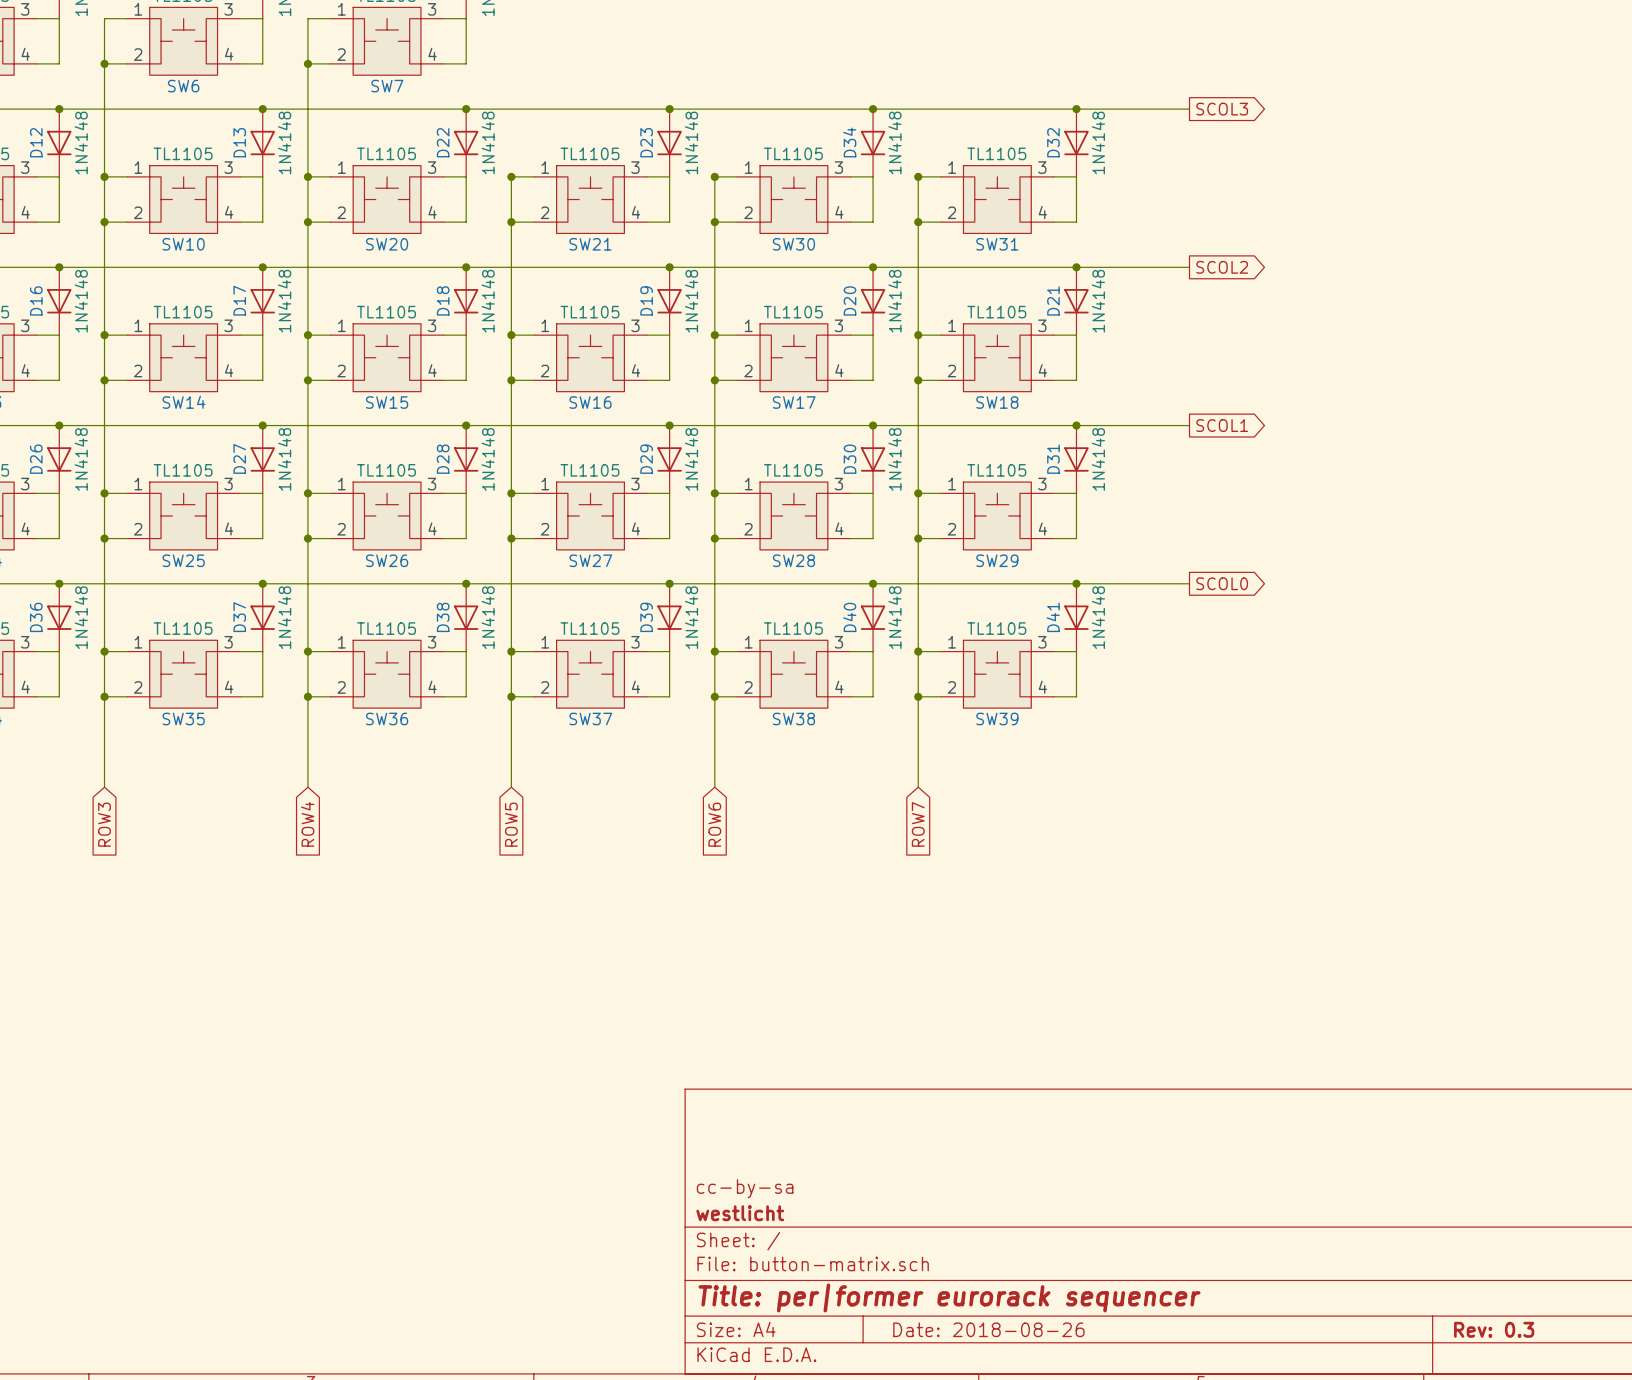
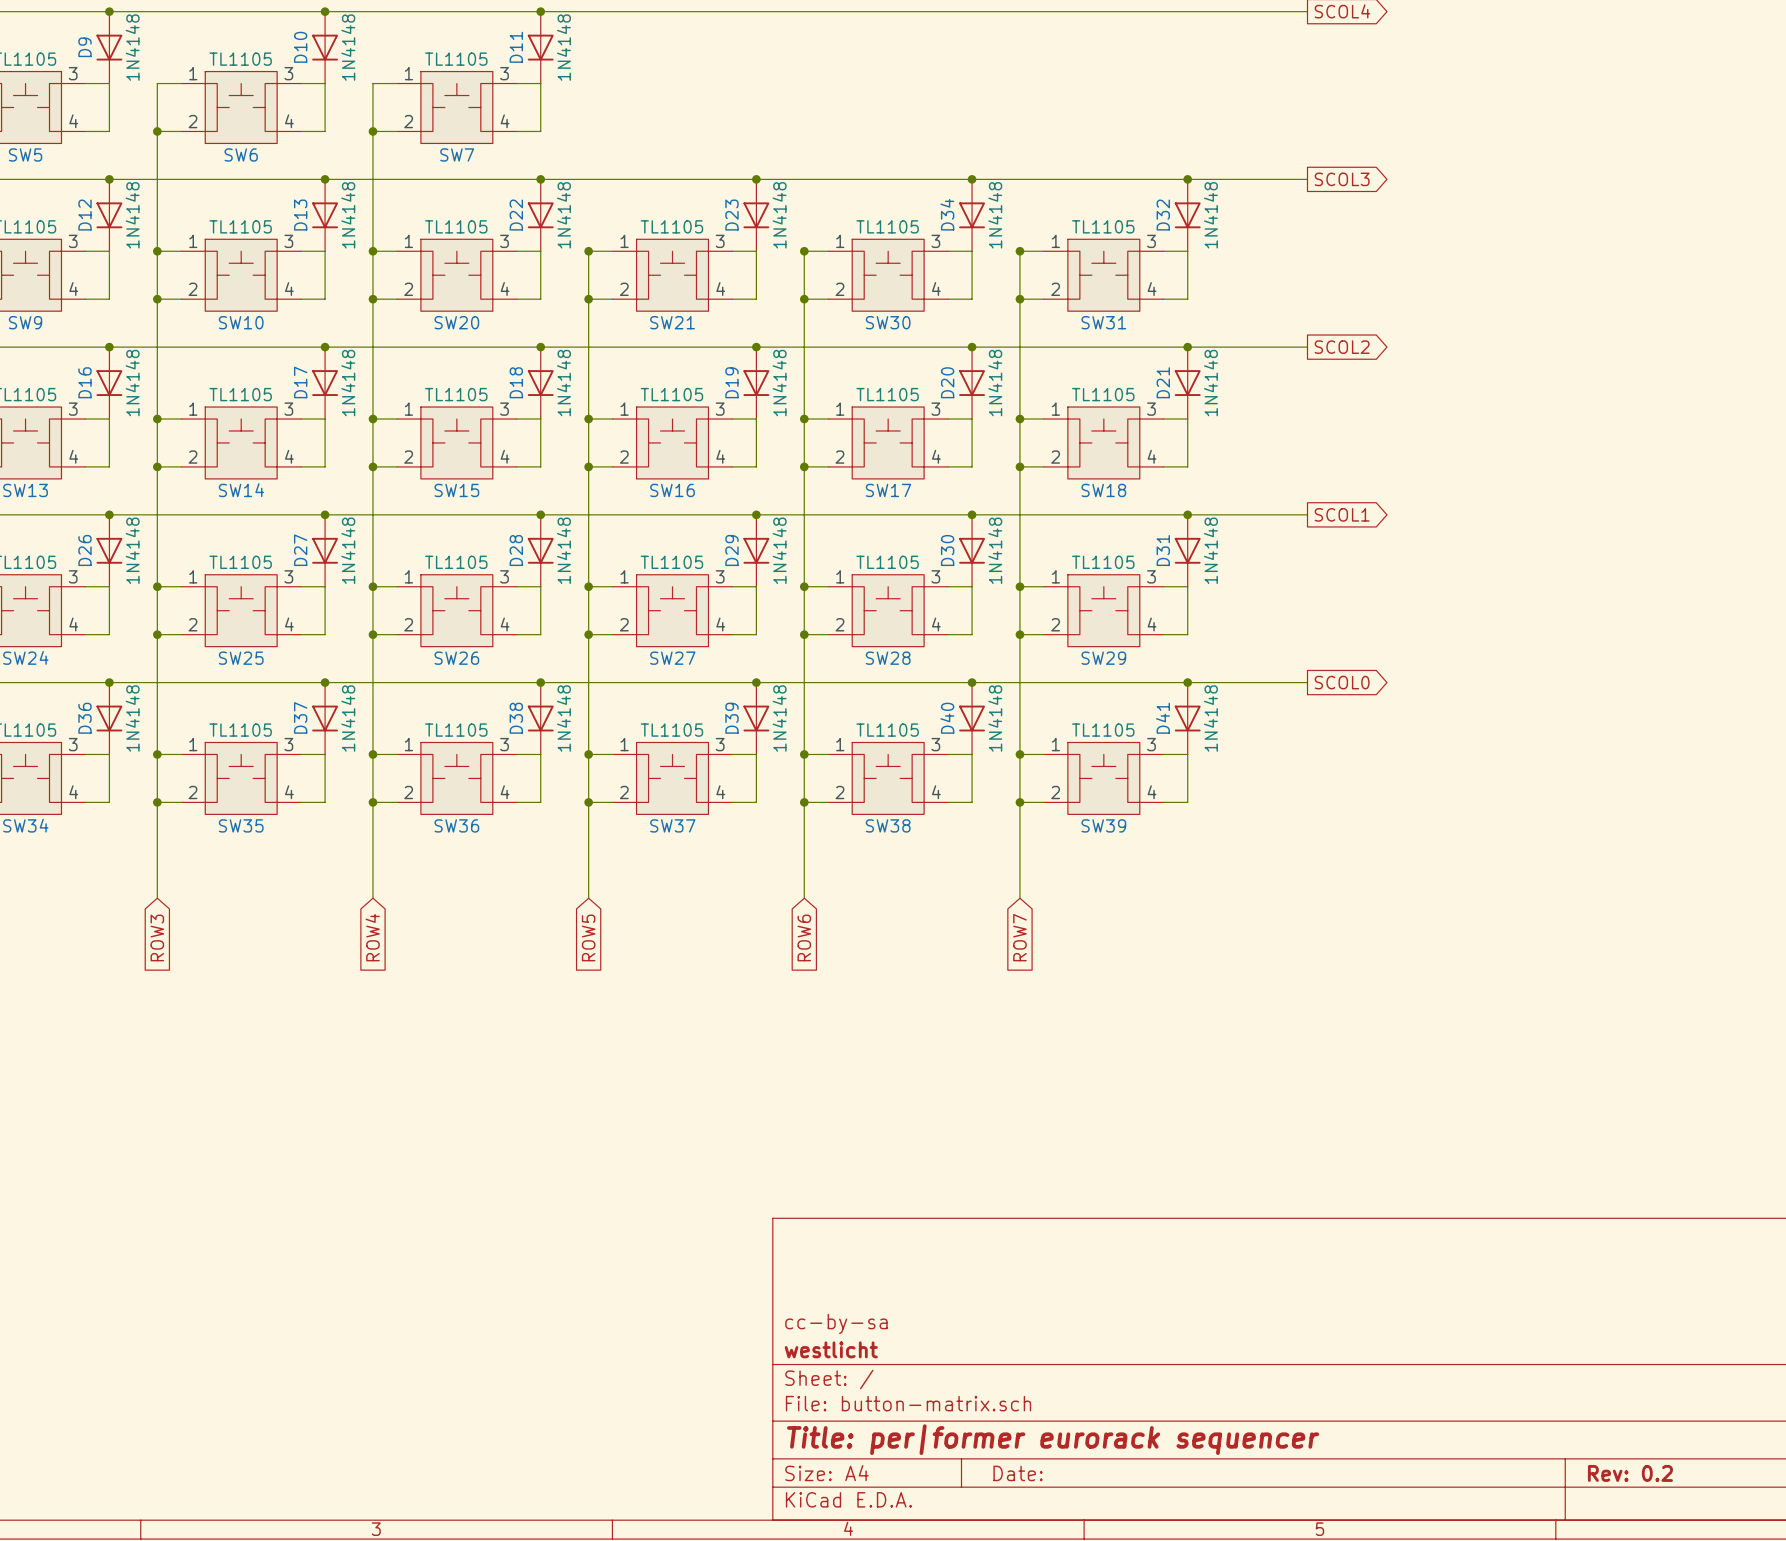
title block: Date: 2018-08-26 (988, 1329) -> Date: (1018, 1473)
title block: Rev: 0.3 (1494, 1329) -> Rev: 0.2 (1630, 1473)

